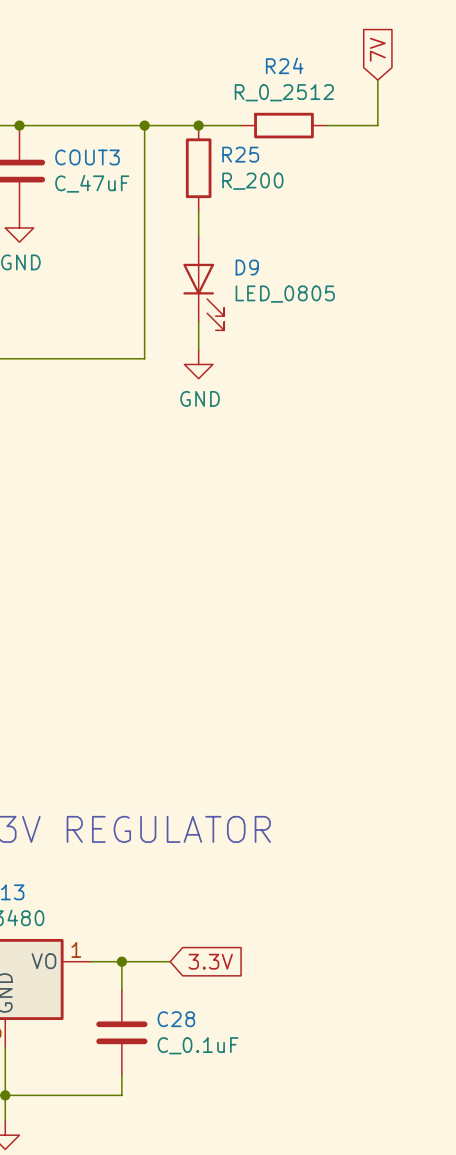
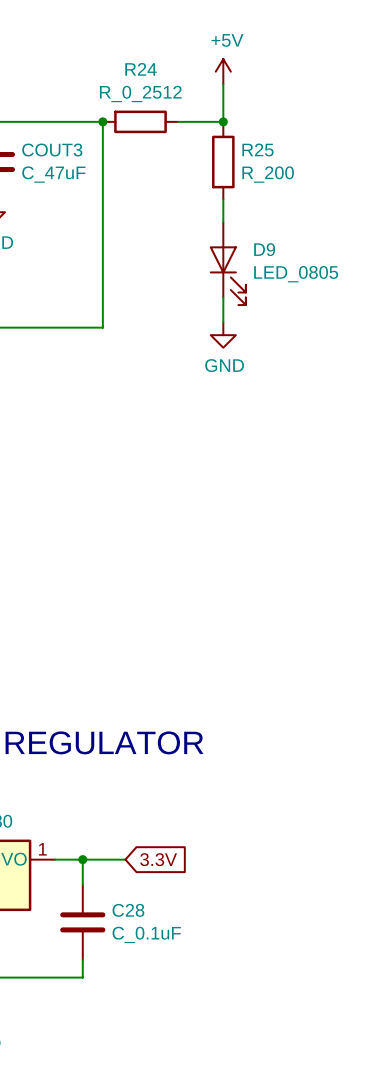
global label: 7V (377, 49) -> none
power symbol: none -> +5V (223, 71)
wire: (377, 80) (377, 125) (326, 125) -> none
wire: none -> (223, 84) (223, 124)
wire: (144, 125) (229, 125) -> none
junction: (198, 125) -> none
wire: none -> (188, 121) (223, 121)
junction: none -> (223, 121)
R24 position: (283, 125) -> (140, 121)
R25 position: (198, 168) -> (223, 162)
wire: (198, 210) (198, 236) -> (223, 199) (223, 222)
D9 position: (203, 283) -> (227, 263)
wire: (198, 321) (198, 350) -> (223, 297) (223, 322)
power symbol position: GND (198, 364) -> GND (223, 335)

